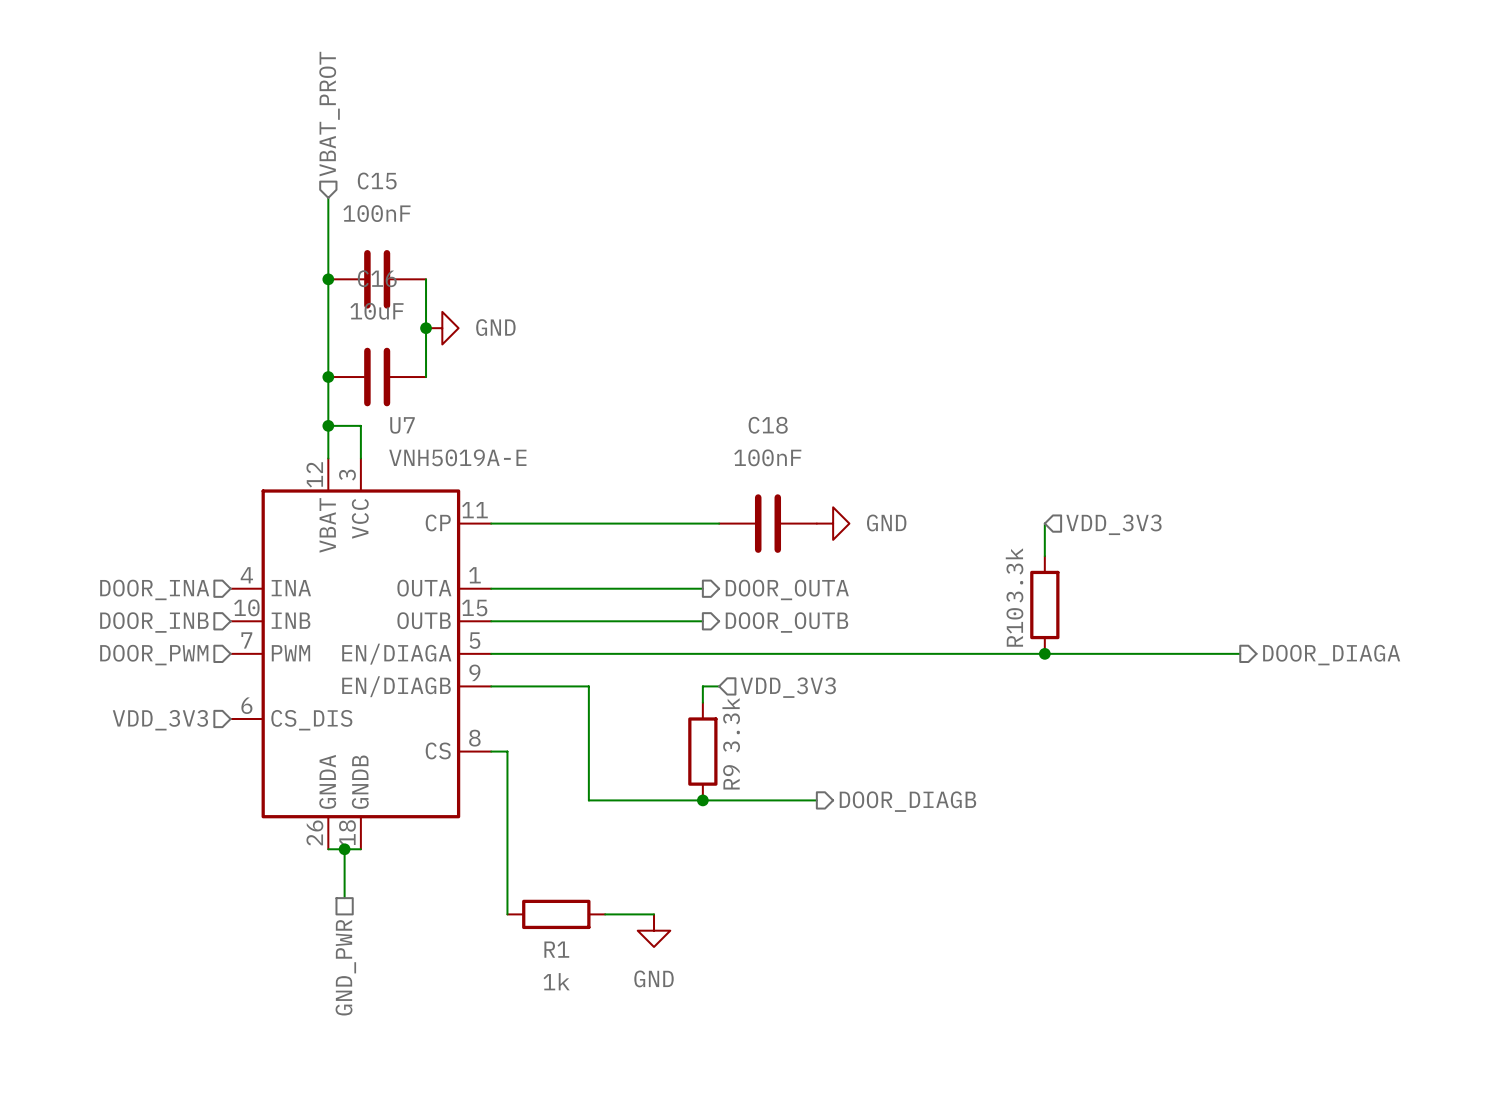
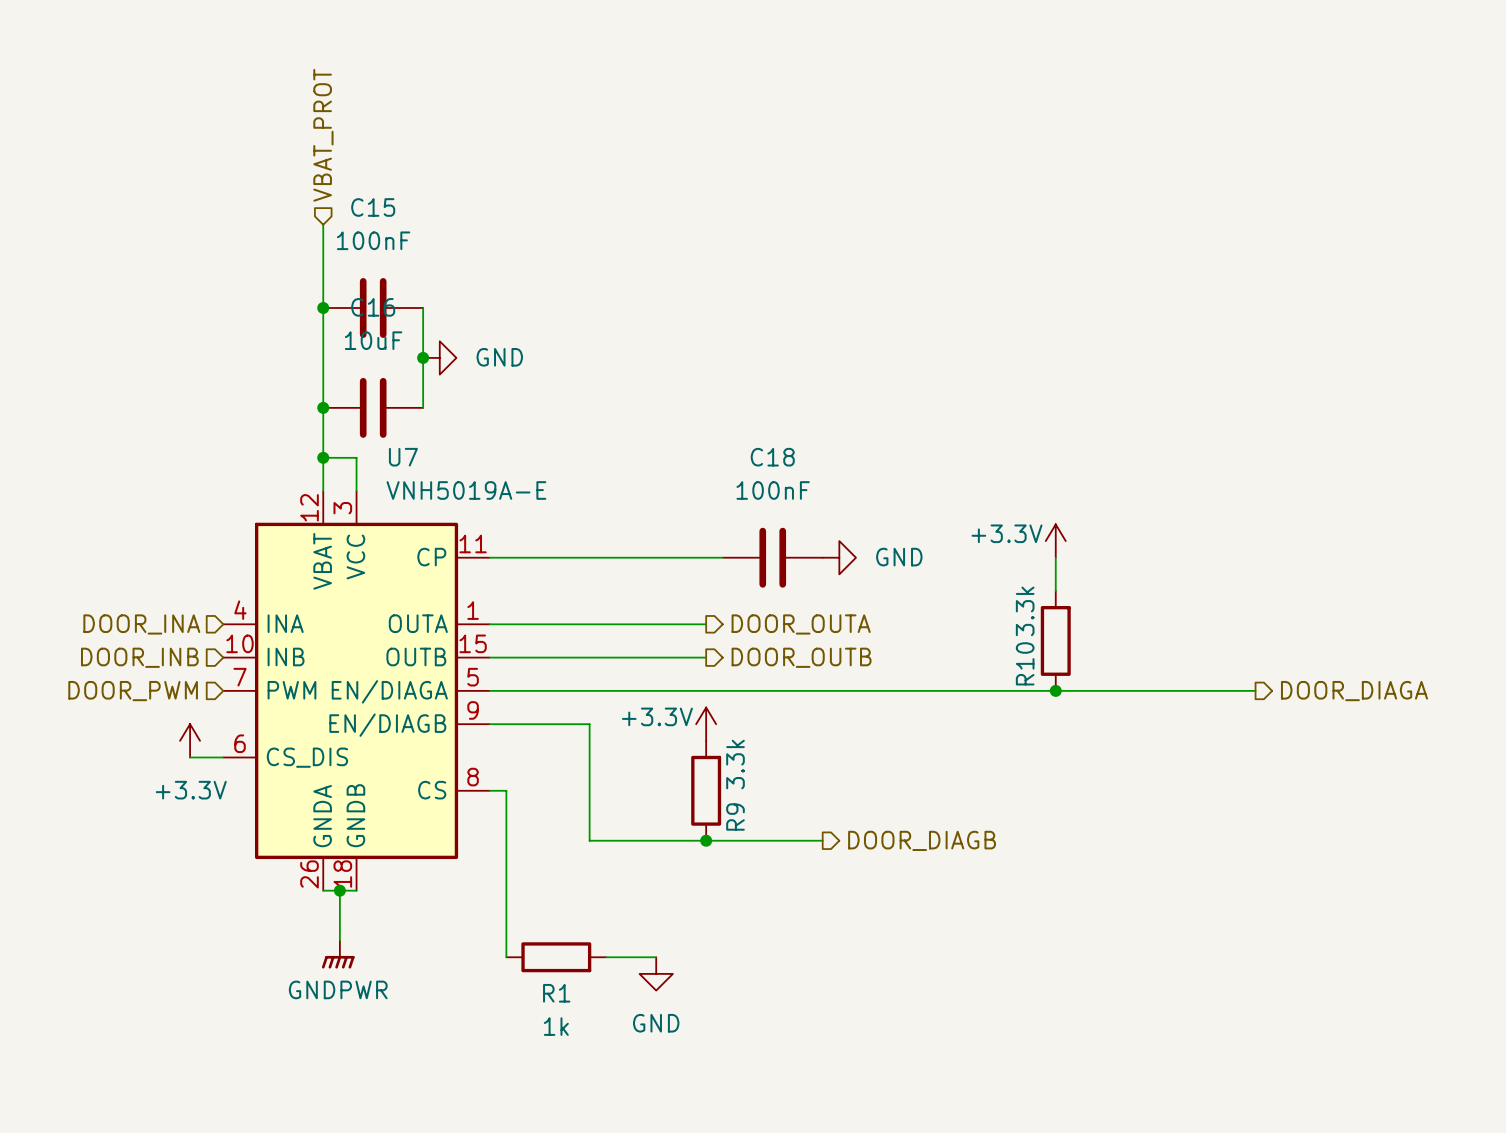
power symbol: none -> +3.3V (1055, 541)
hierarchical label: VDD_3V3 (1113, 524) -> none
power symbol: none -> +3.3V (706, 724)
hierarchical label: VDD_3V3 (788, 687) -> none
power symbol: none -> +3.3V (190, 740)
wire: none -> (190, 757) (223, 757)
hierarchical label: VDD_3V3 (160, 720) -> none
power symbol: none -> GNDPWR (338, 954)
hierarchical label: GND_PWR (345, 967) -> none

